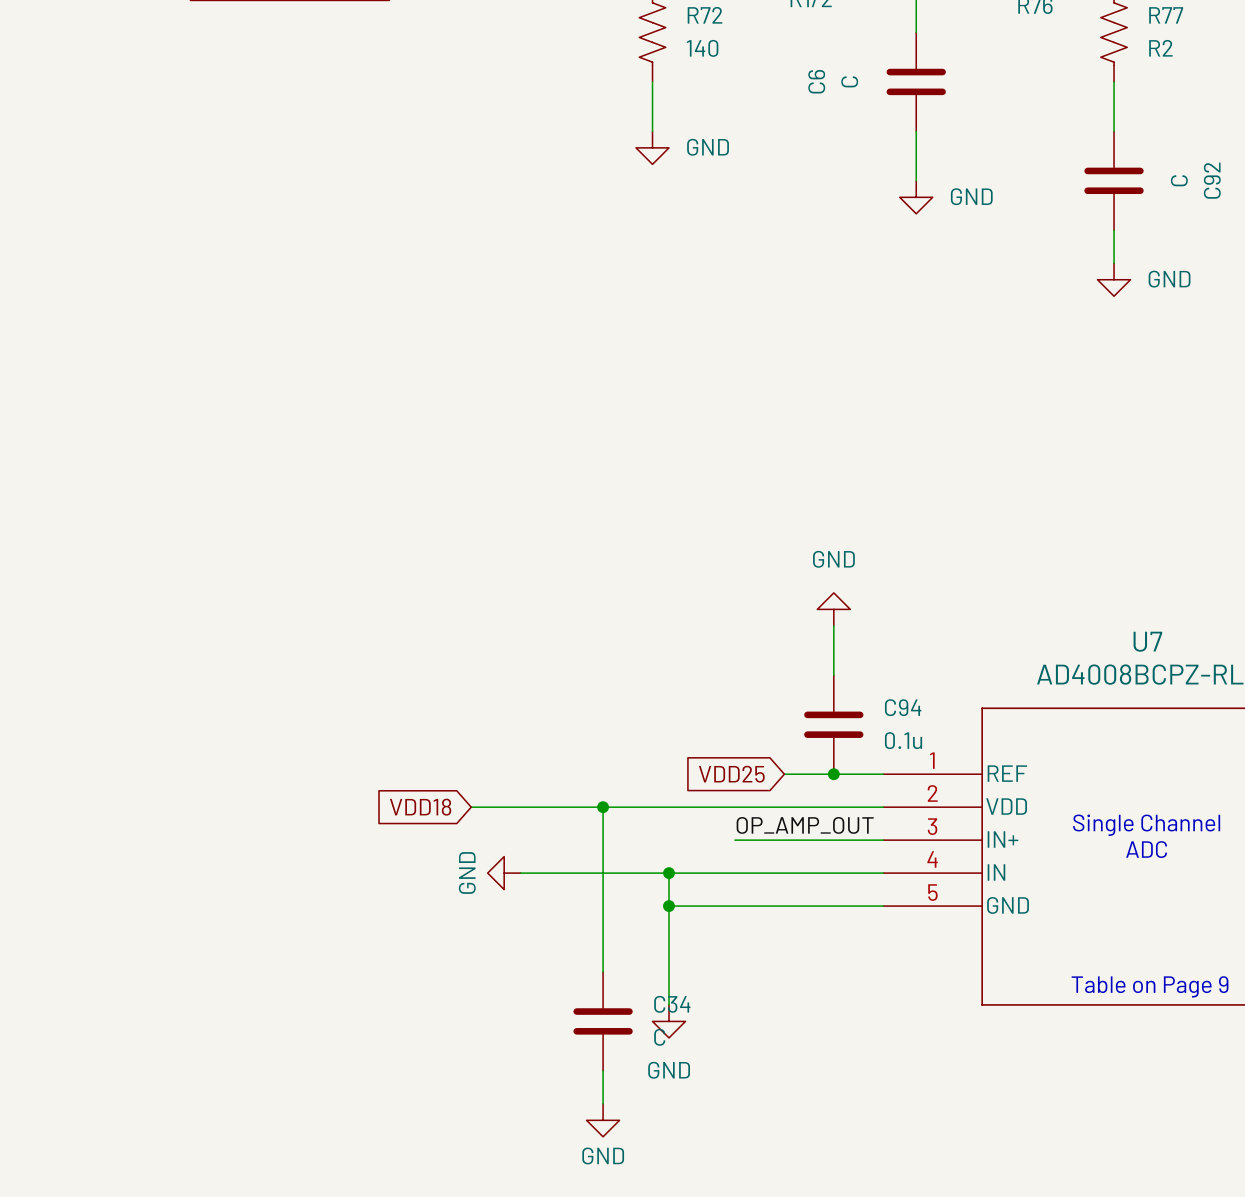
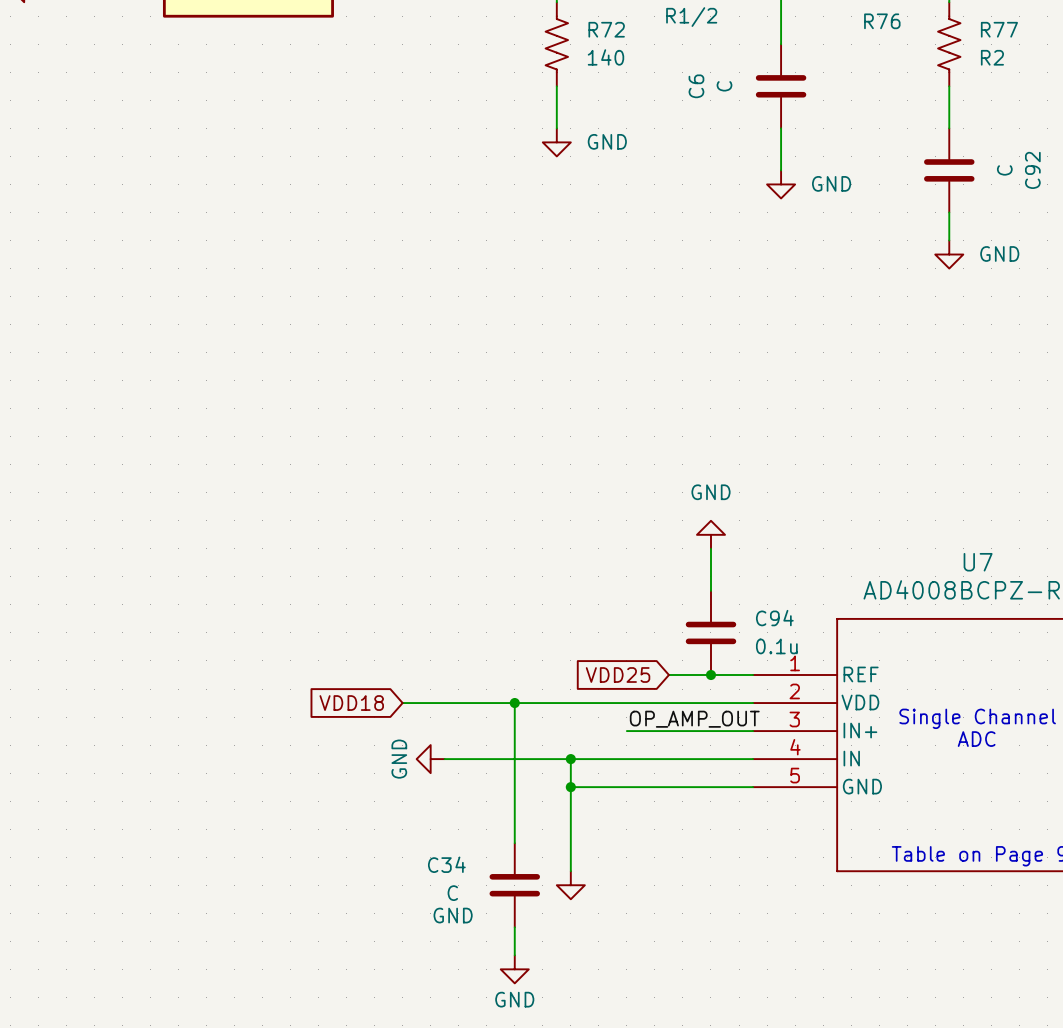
C34 name position: C34 (672, 1004) -> C34 (446, 864)
C34 value position: C (659, 1037) -> C (452, 893)
power symbol text position: GND (669, 1070) -> GND (453, 915)

